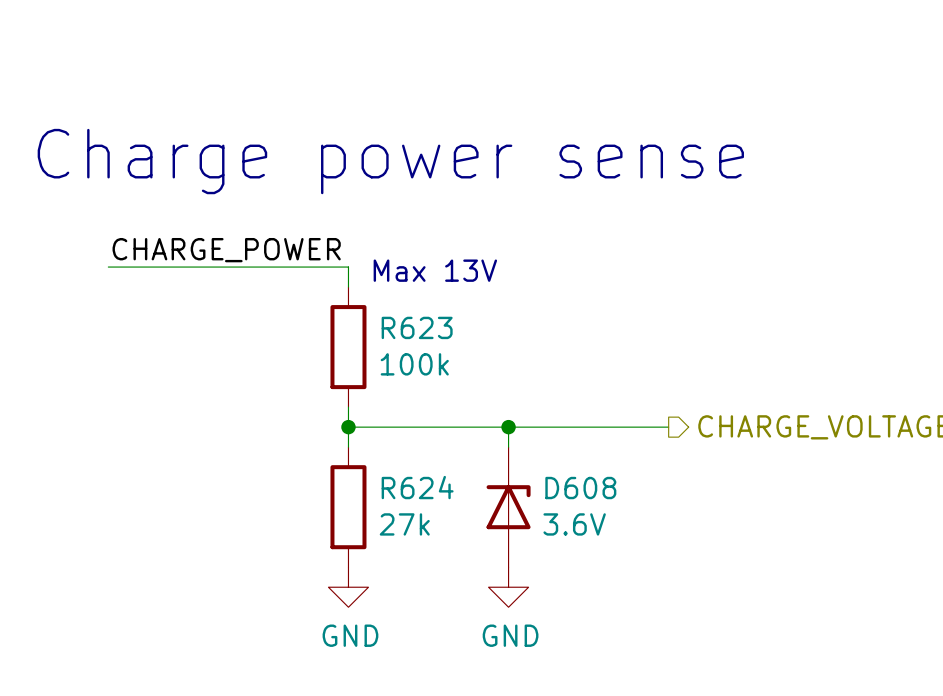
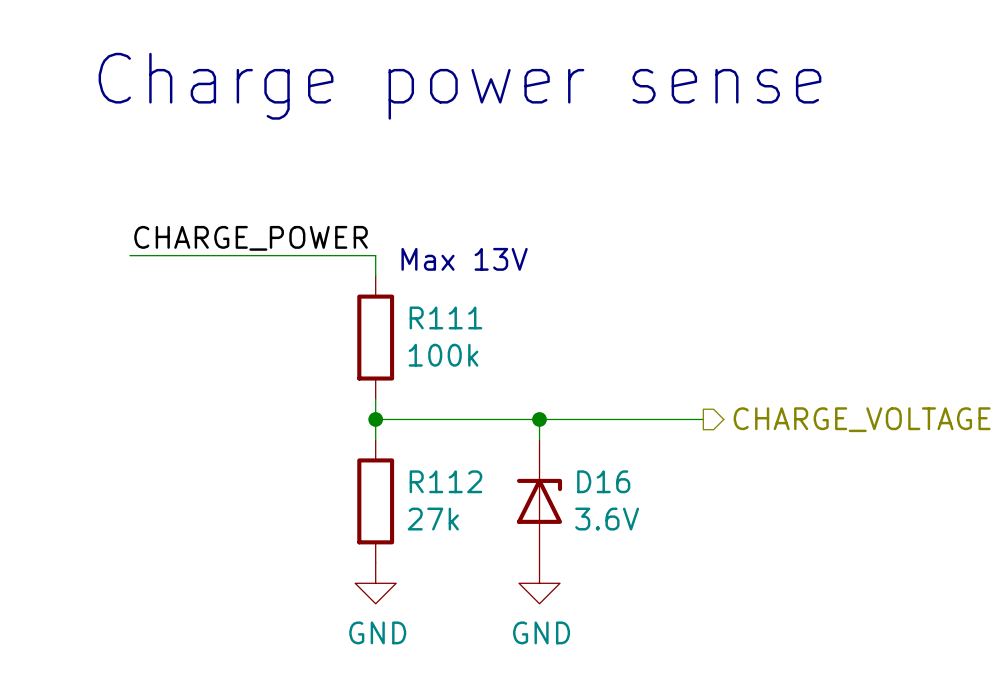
text position: Charge power sense (390, 161) -> Charge power sense (459, 86)
R623 name: R623 (417, 327) -> R111 (445, 317)
R624 name: R624 (417, 487) -> R112 (445, 481)
D608 name: D608 (580, 488) -> D16 (603, 481)

